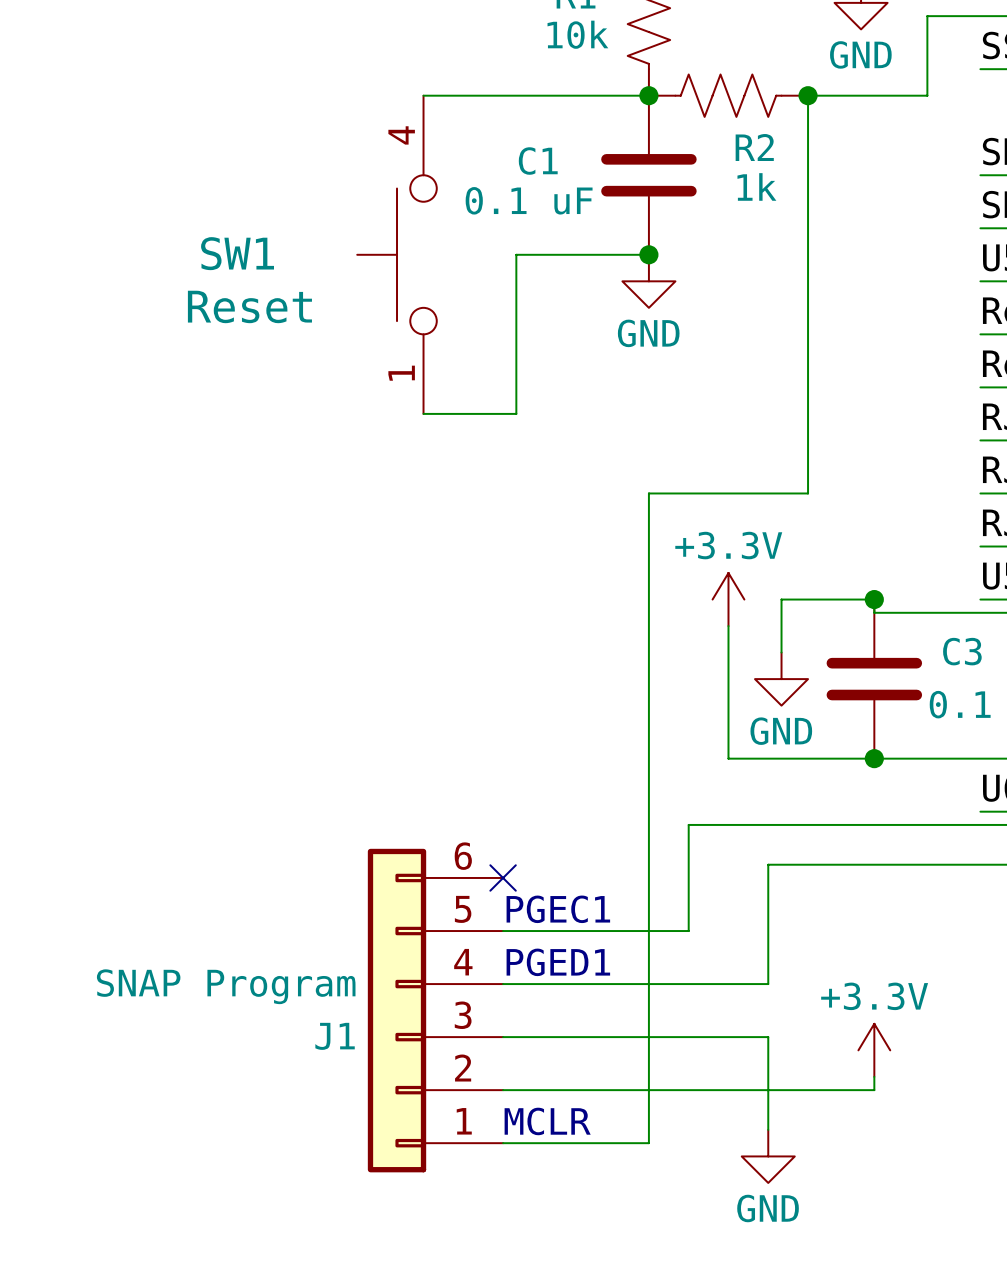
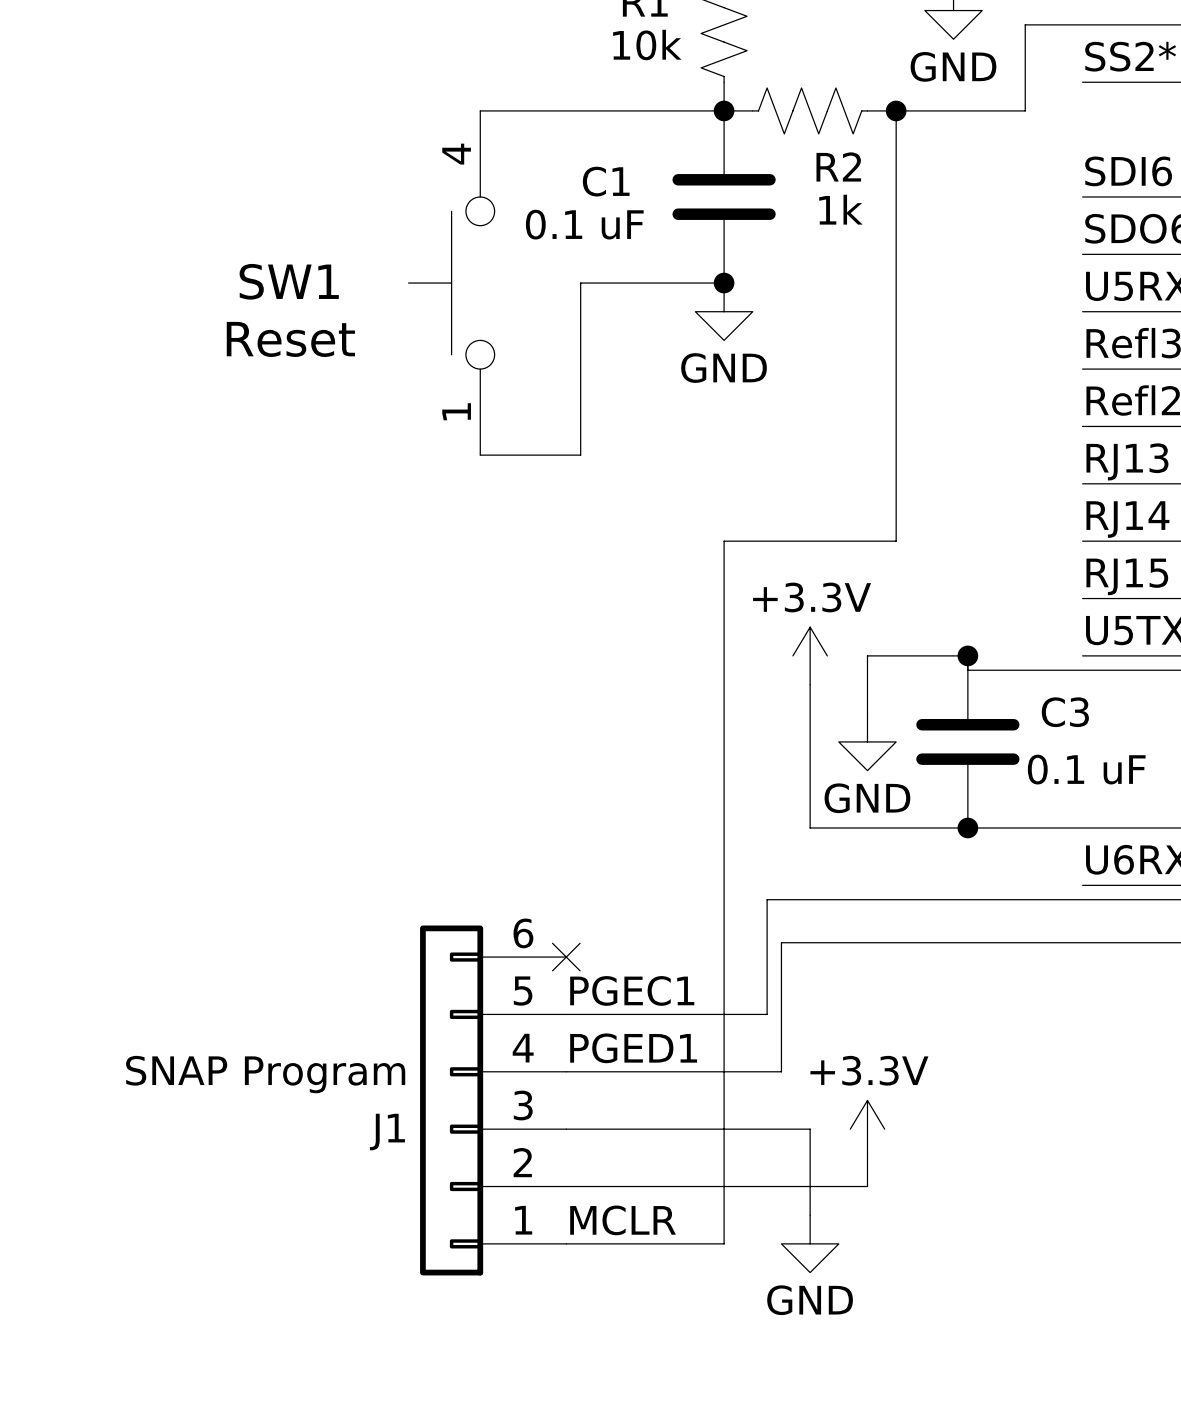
wire: (768, 864) (768, 984) (701, 984) -> (853, 942) (781, 942) (781, 1071)
wire: (728, 1037) (768, 1037) (768, 1129) -> (810, 1129) (810, 1215)
power symbol position: +3.3V (874, 1050) -> +3.3V (867, 1129)
wire: (874, 1076) (874, 1090) (781, 1090) -> (867, 1157) (867, 1186)
power symbol position: GND (768, 1156) -> GND (810, 1243)

